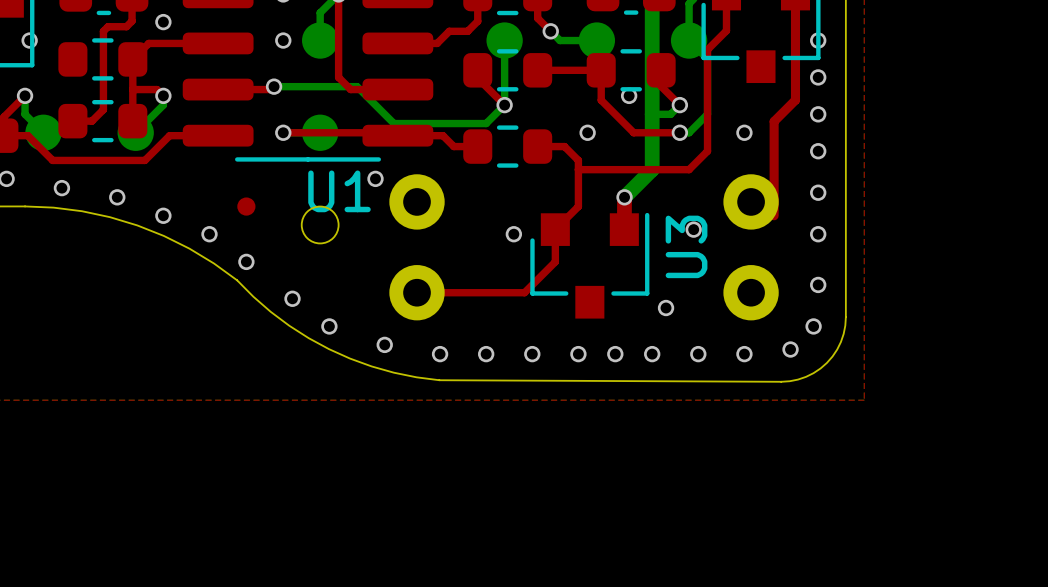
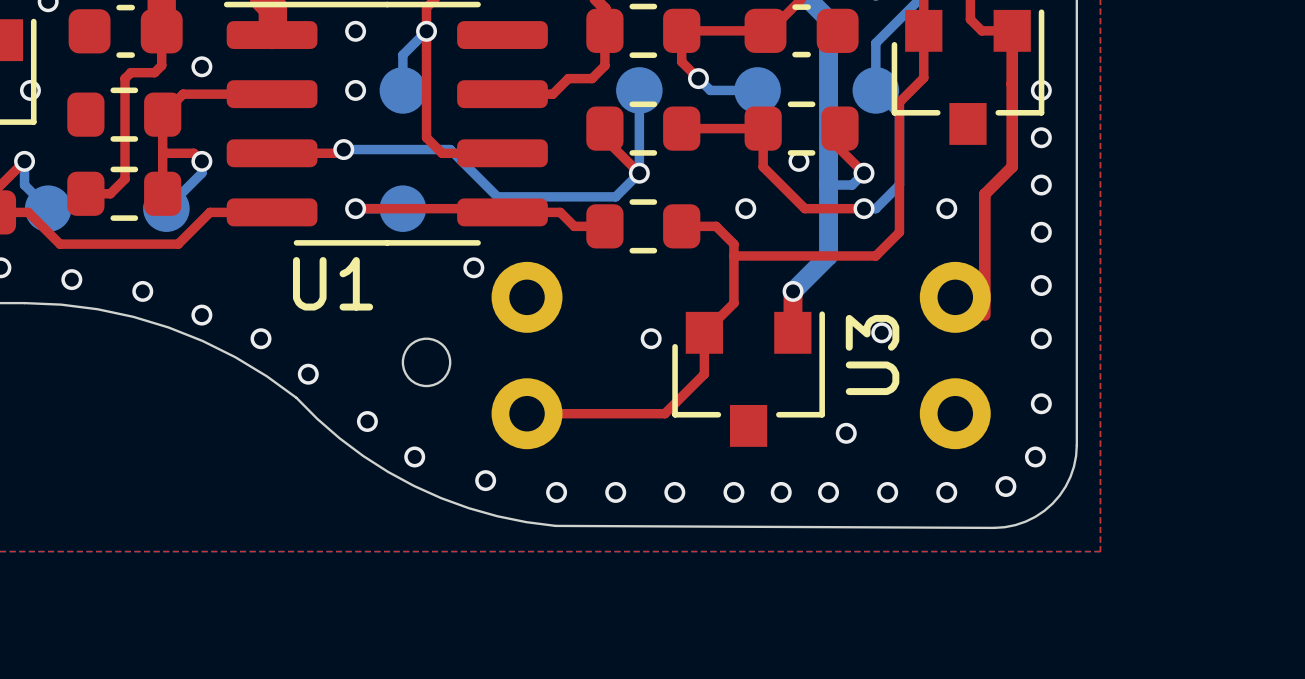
U1 name position: U1 (339, 191) -> U1 (333, 283)
part: (246, 206) -> none
round board edge position: (320, 225) -> (426, 362)

